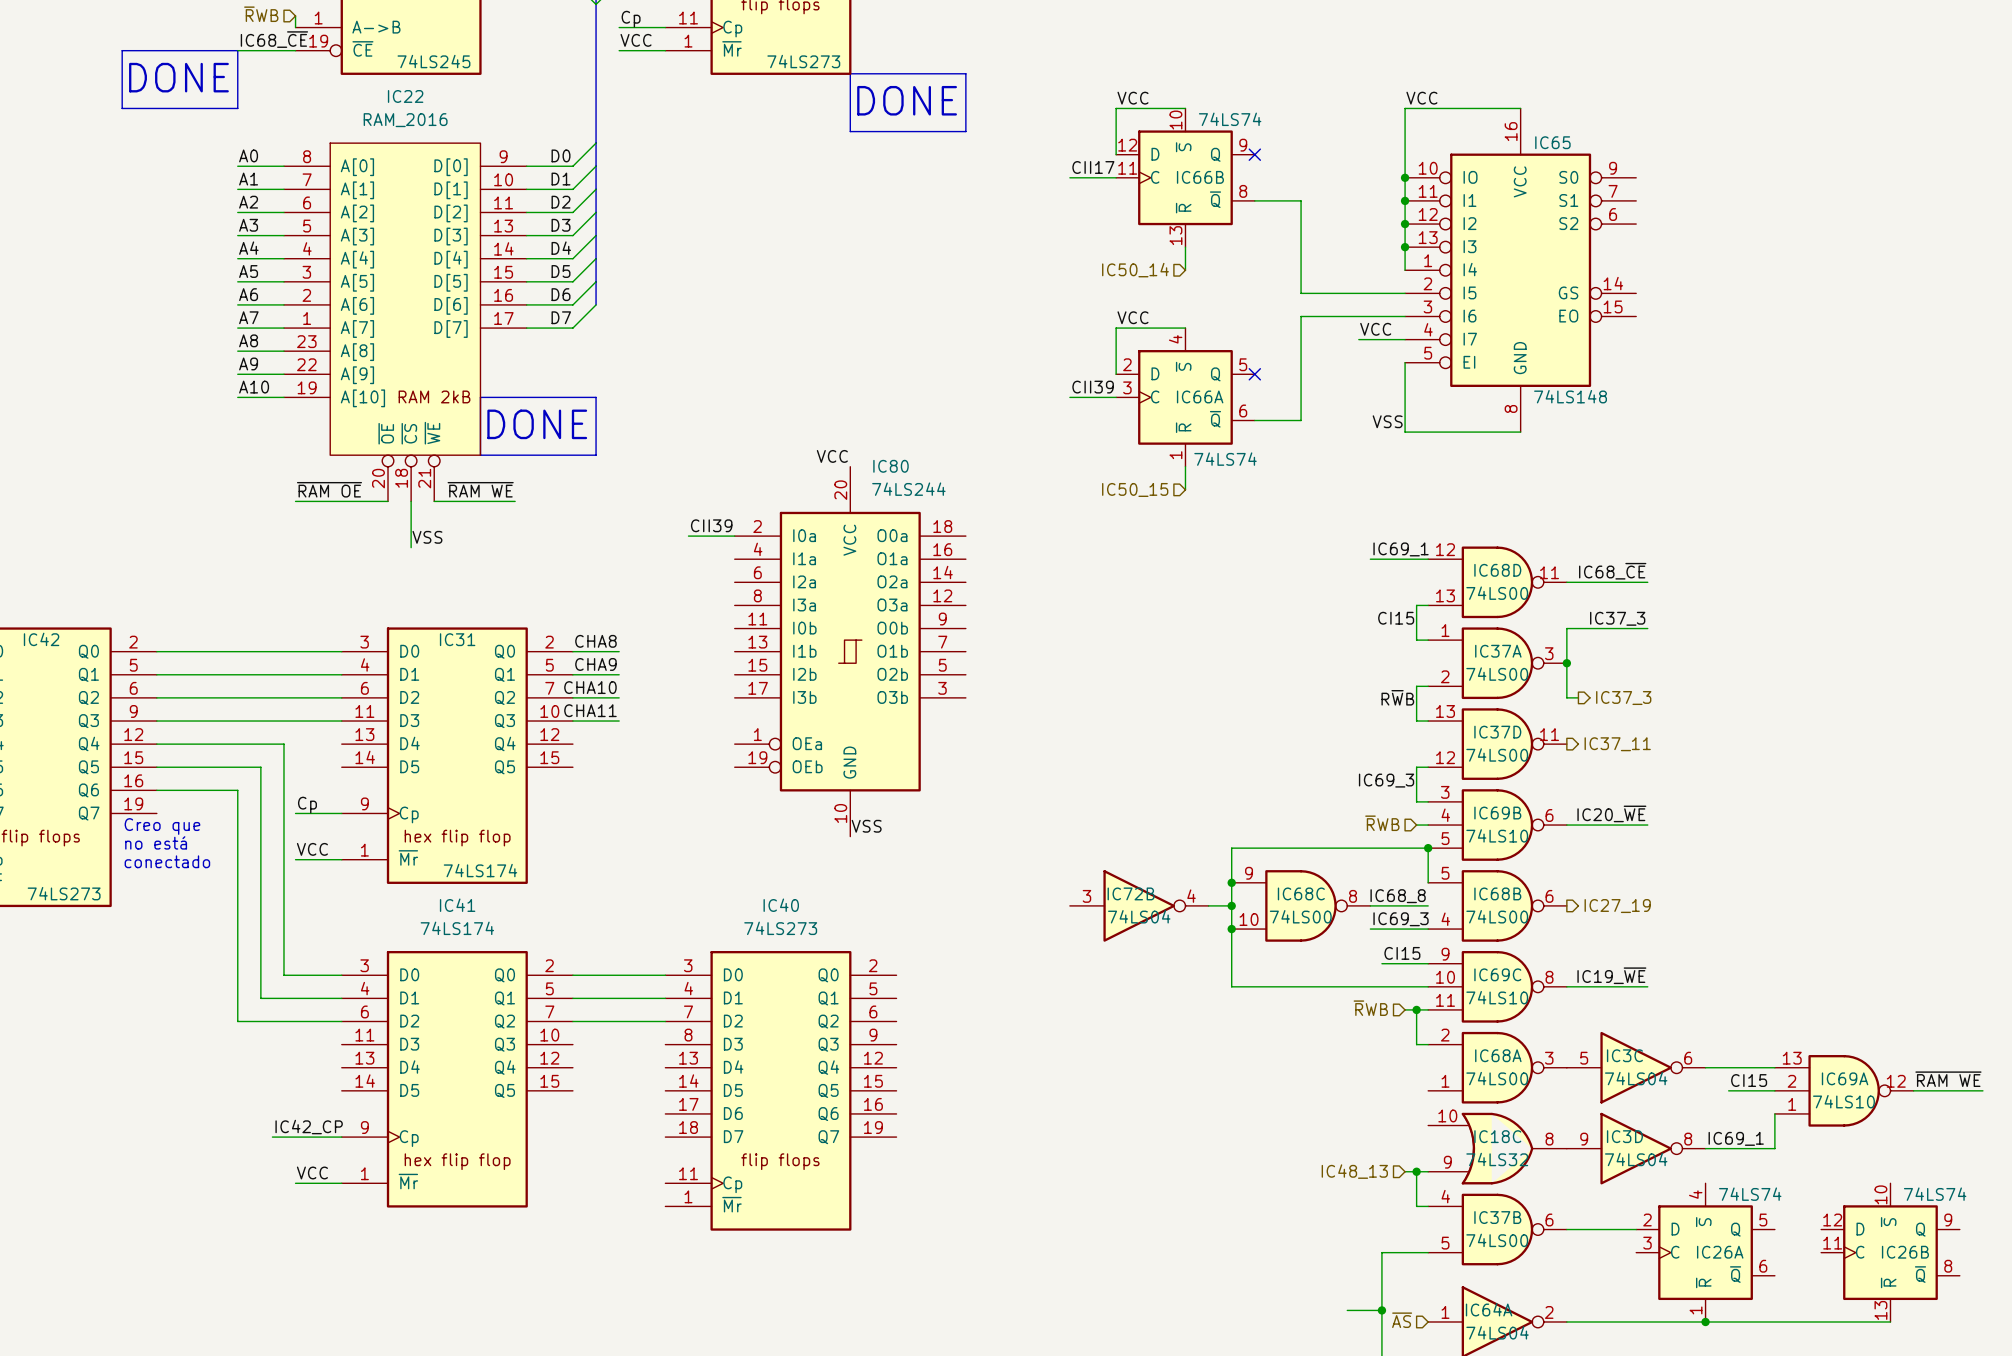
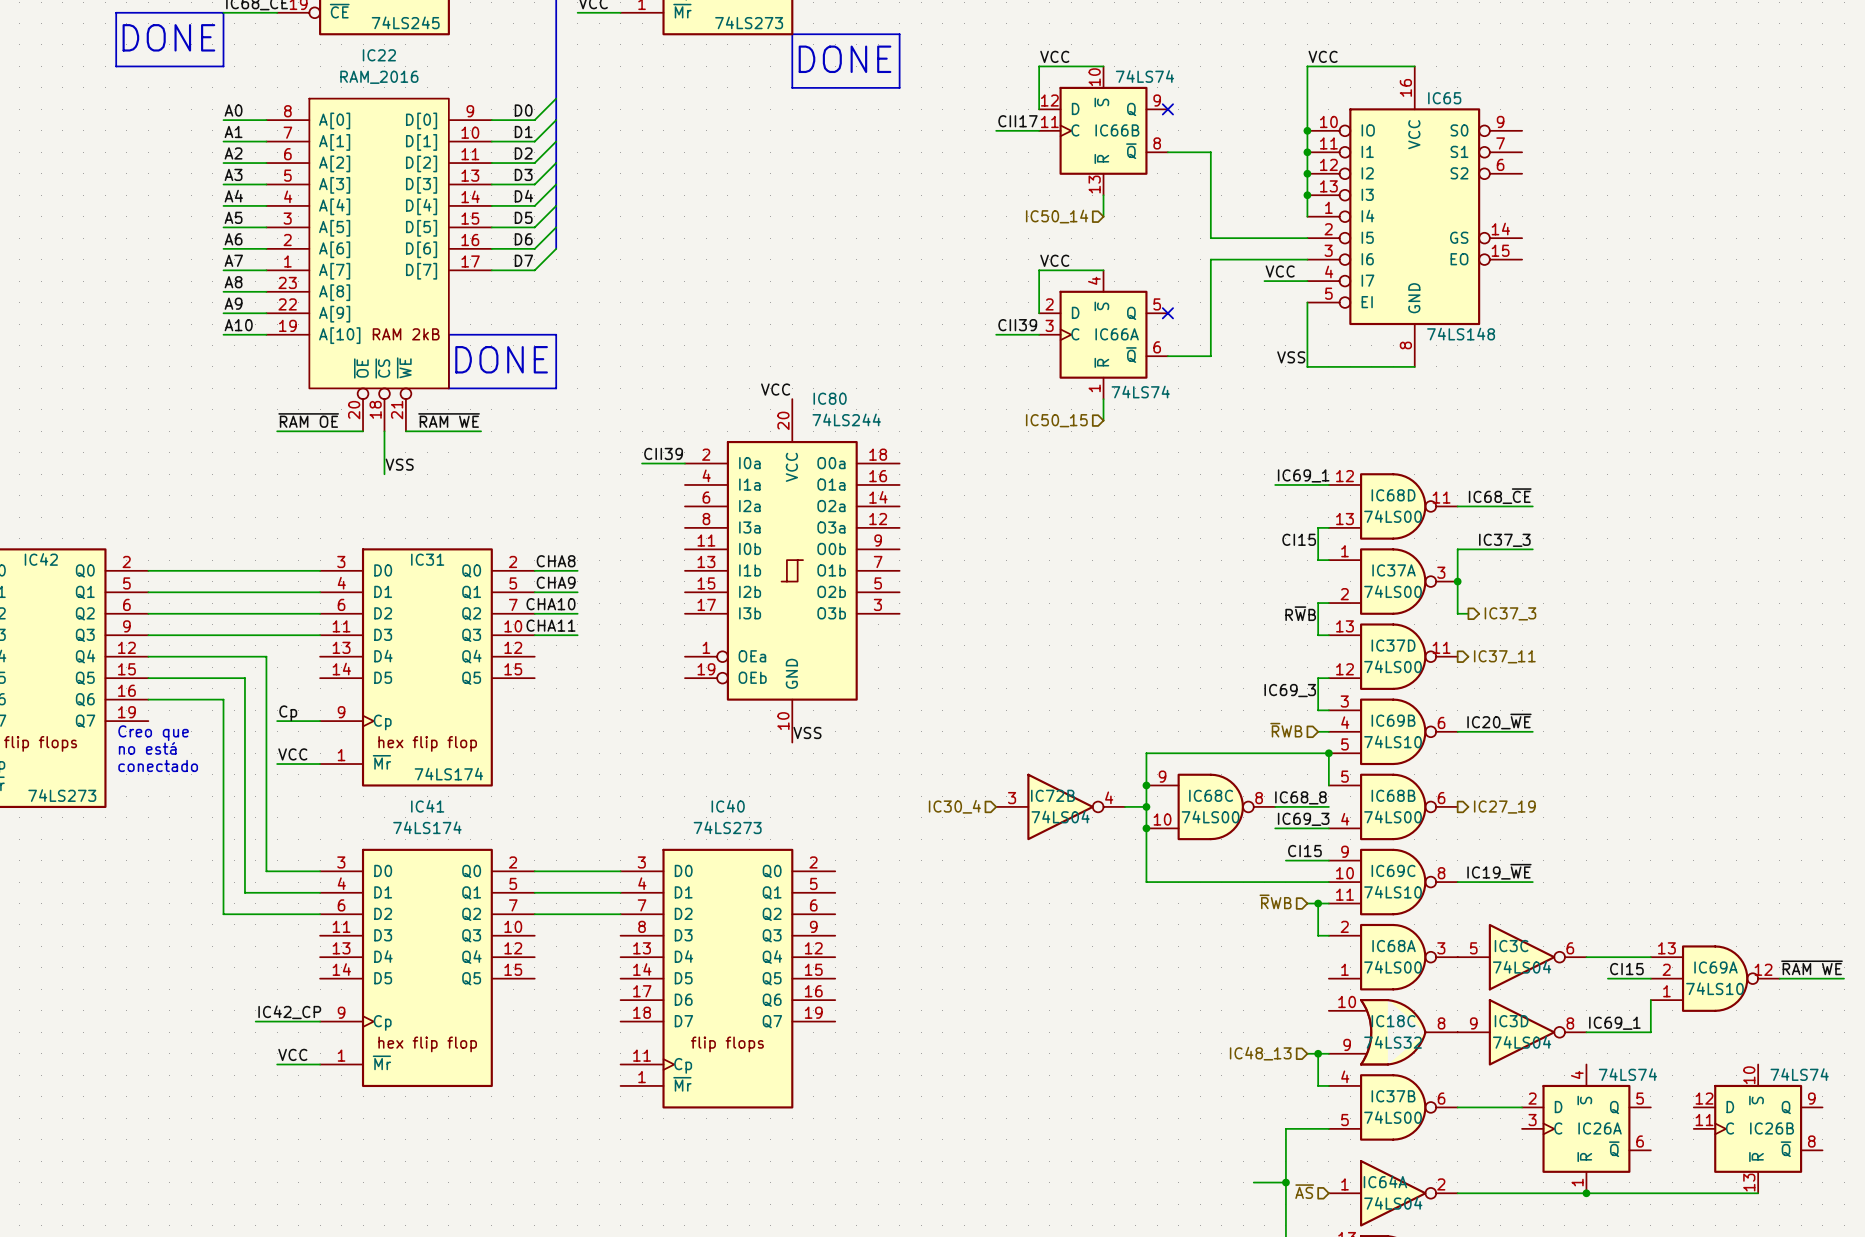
hierarchical label: none -> IC30_4 (954, 806)

